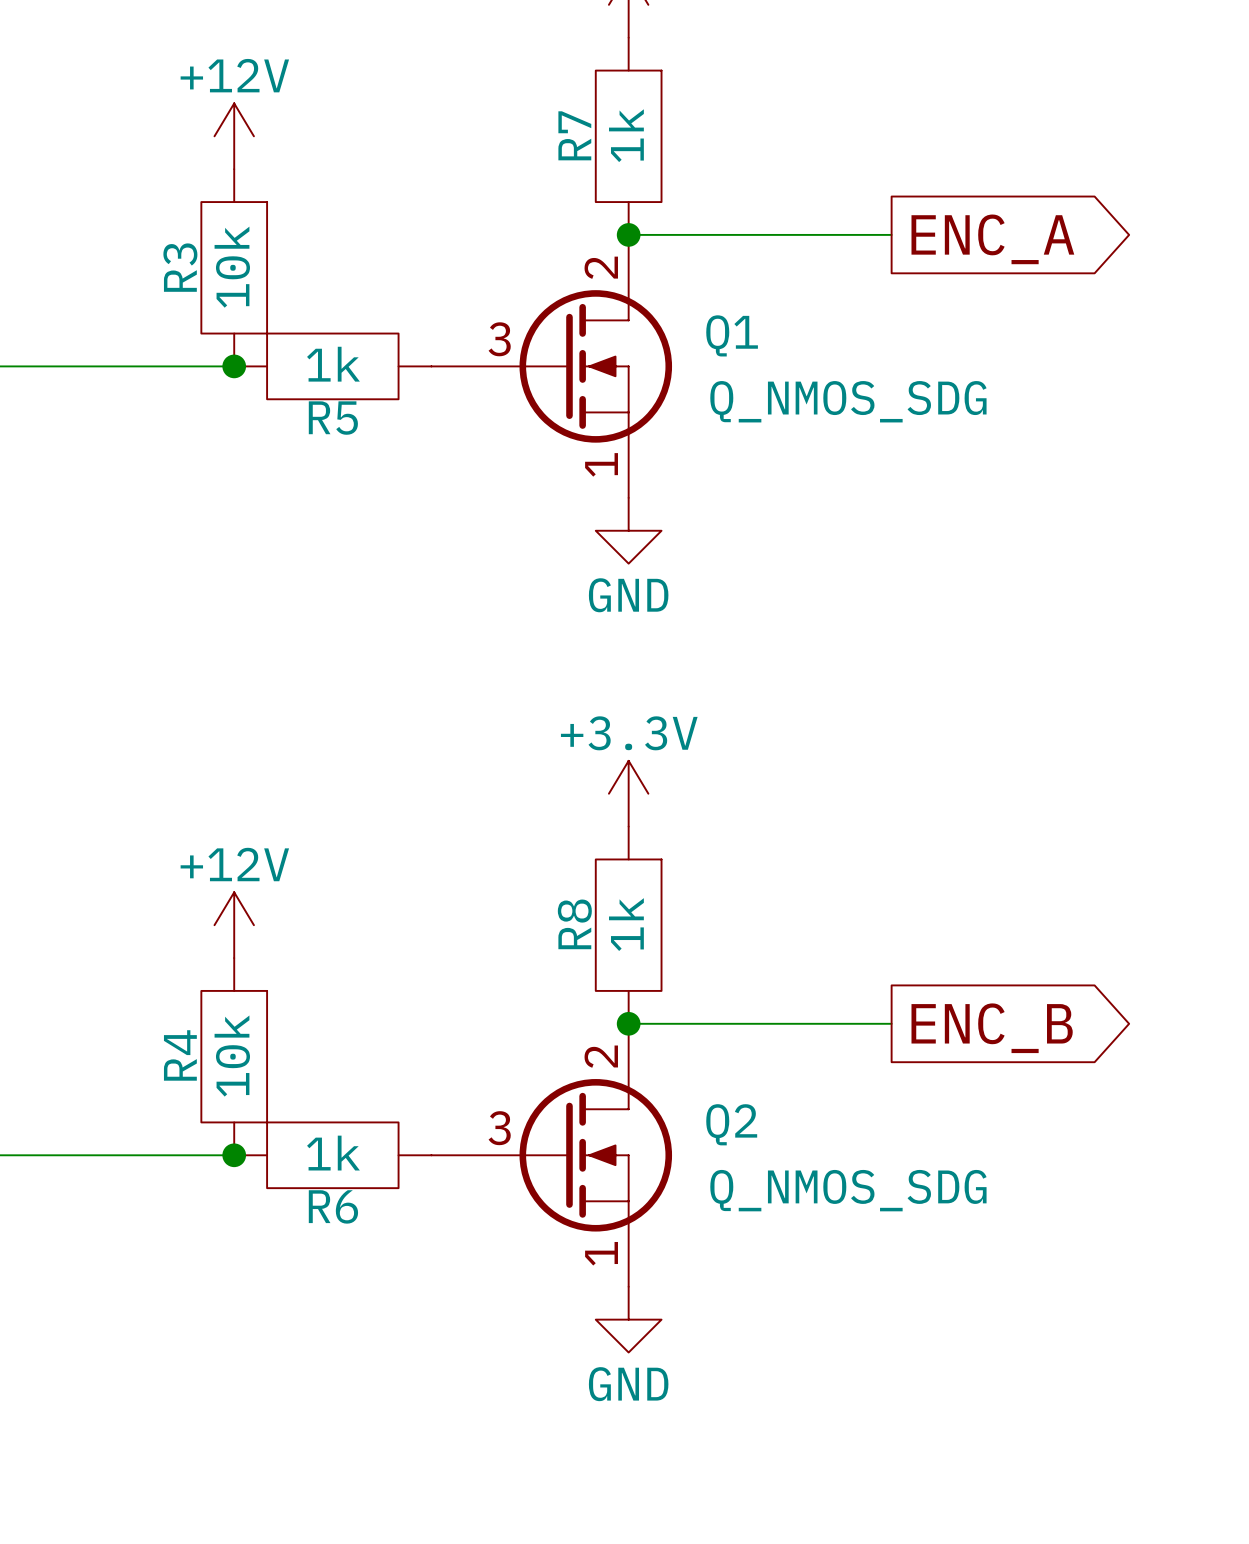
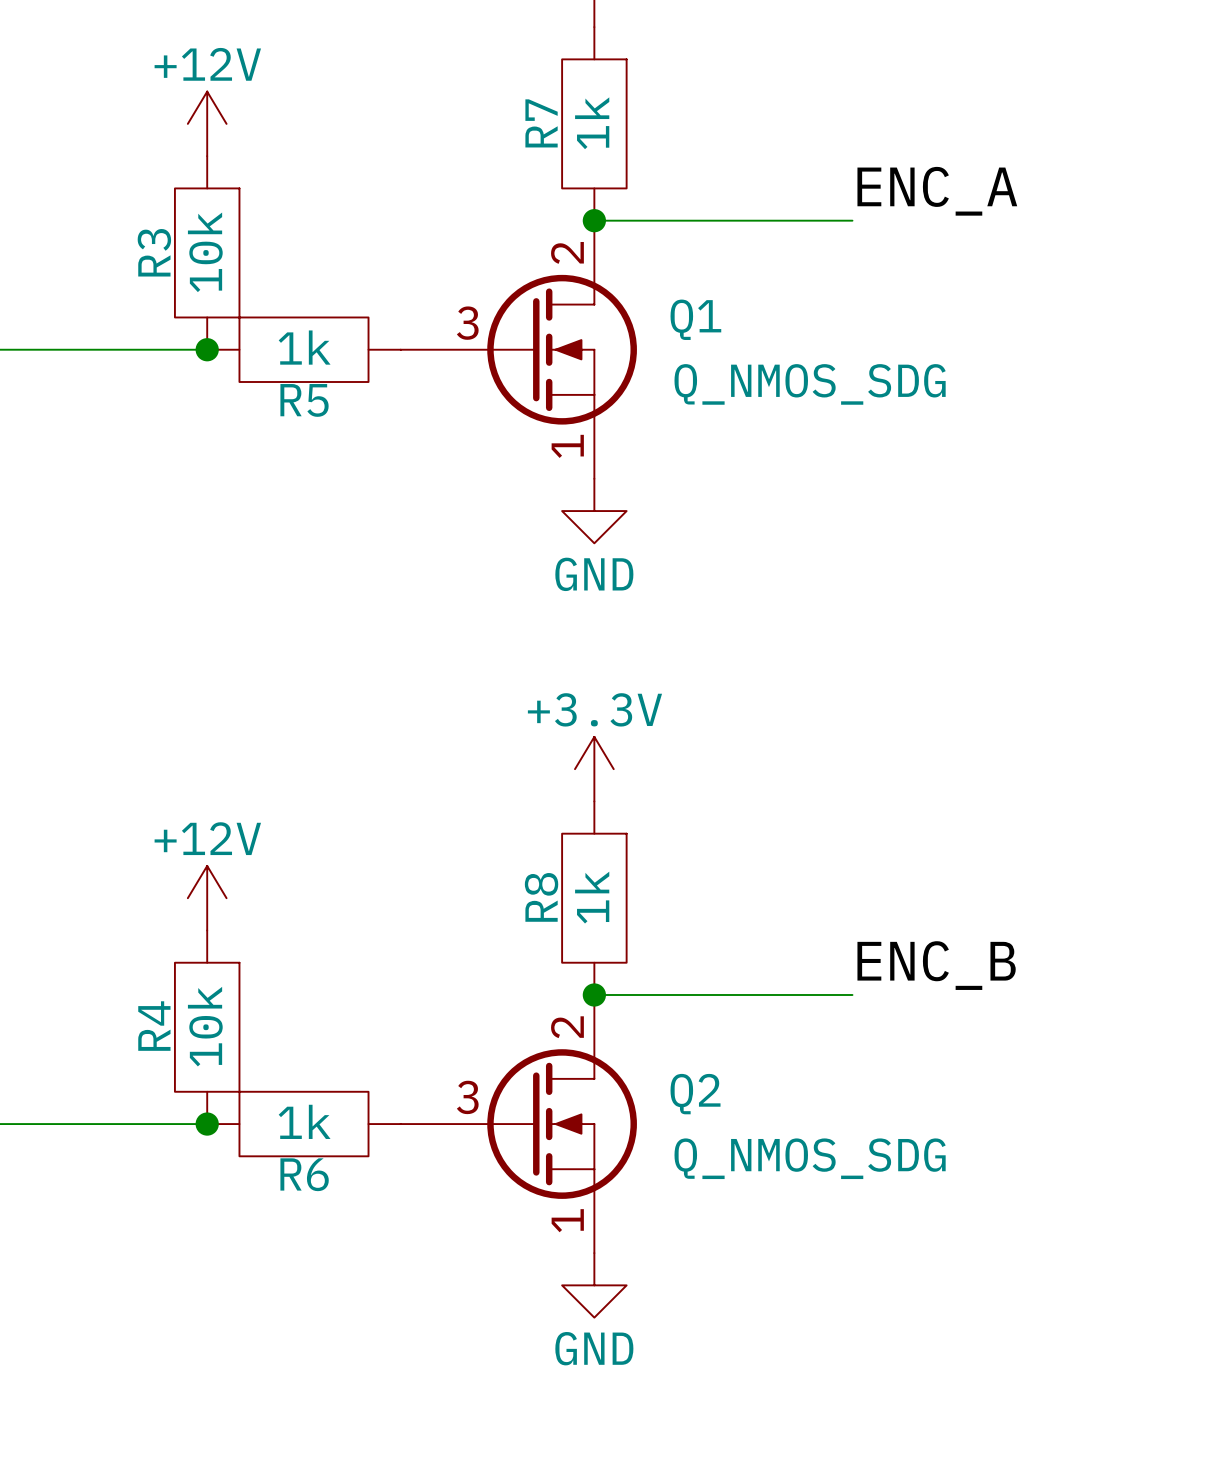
label: none -> ENC_A (937, 191)
global label: ENC_A (992, 239) -> none
label: none -> ENC_B (936, 965)
global label: ENC_B (992, 1028) -> none

